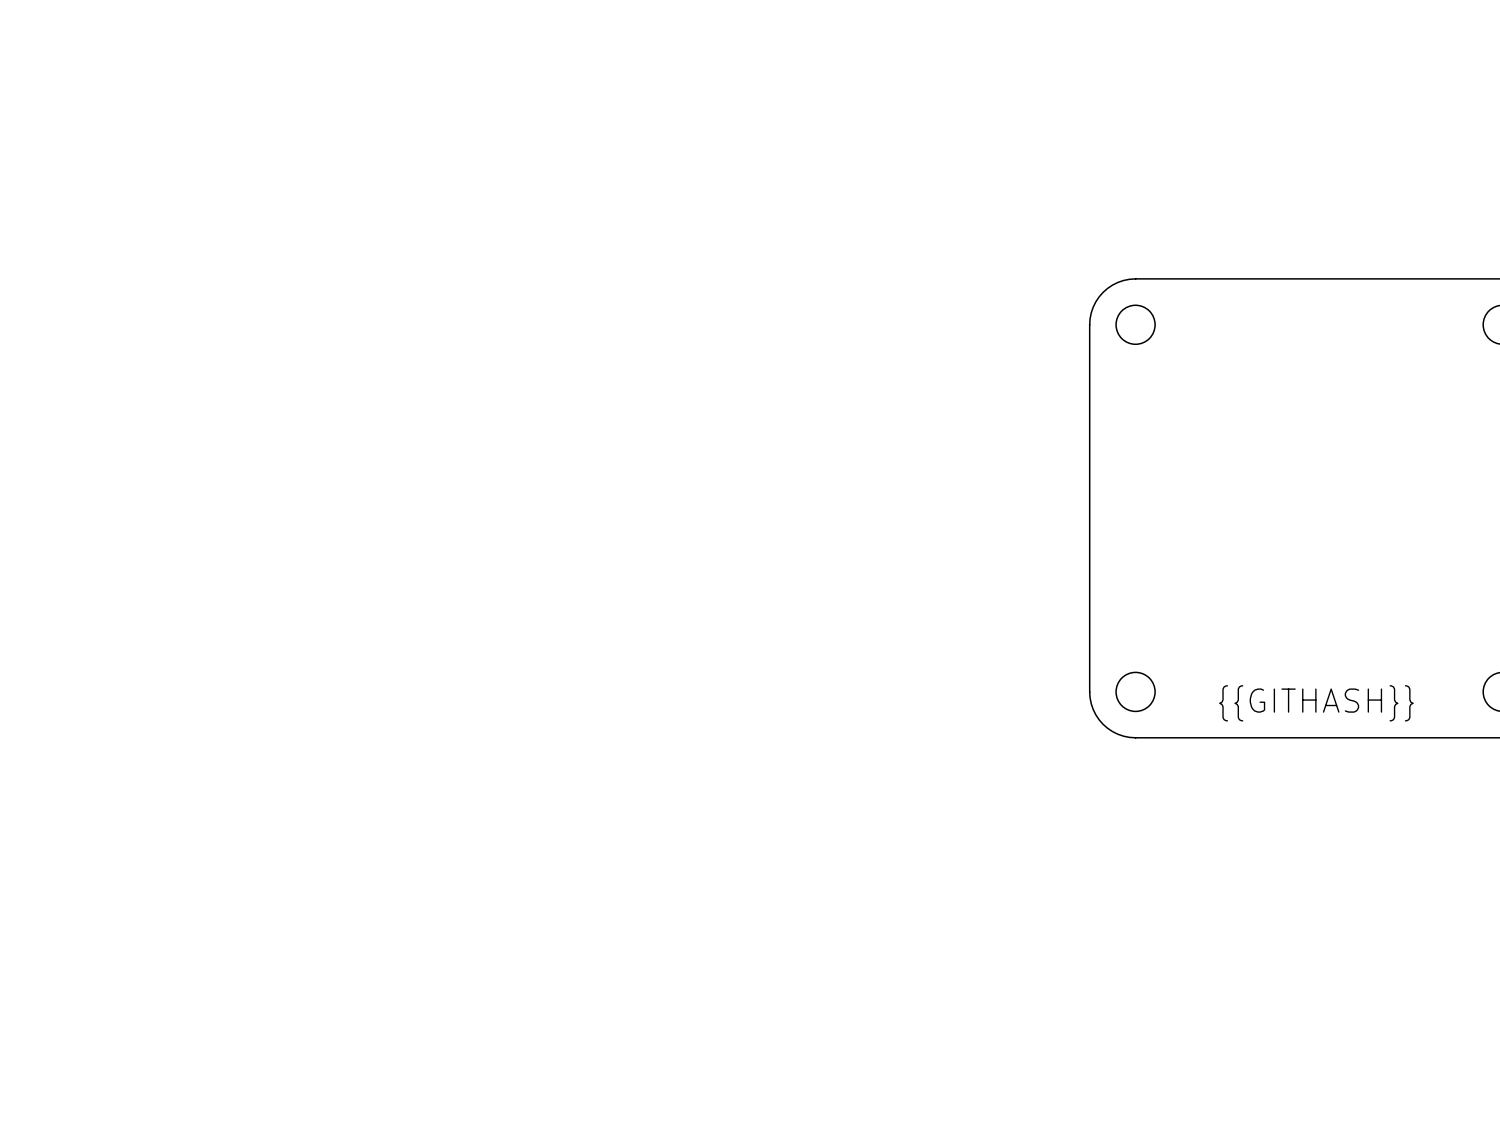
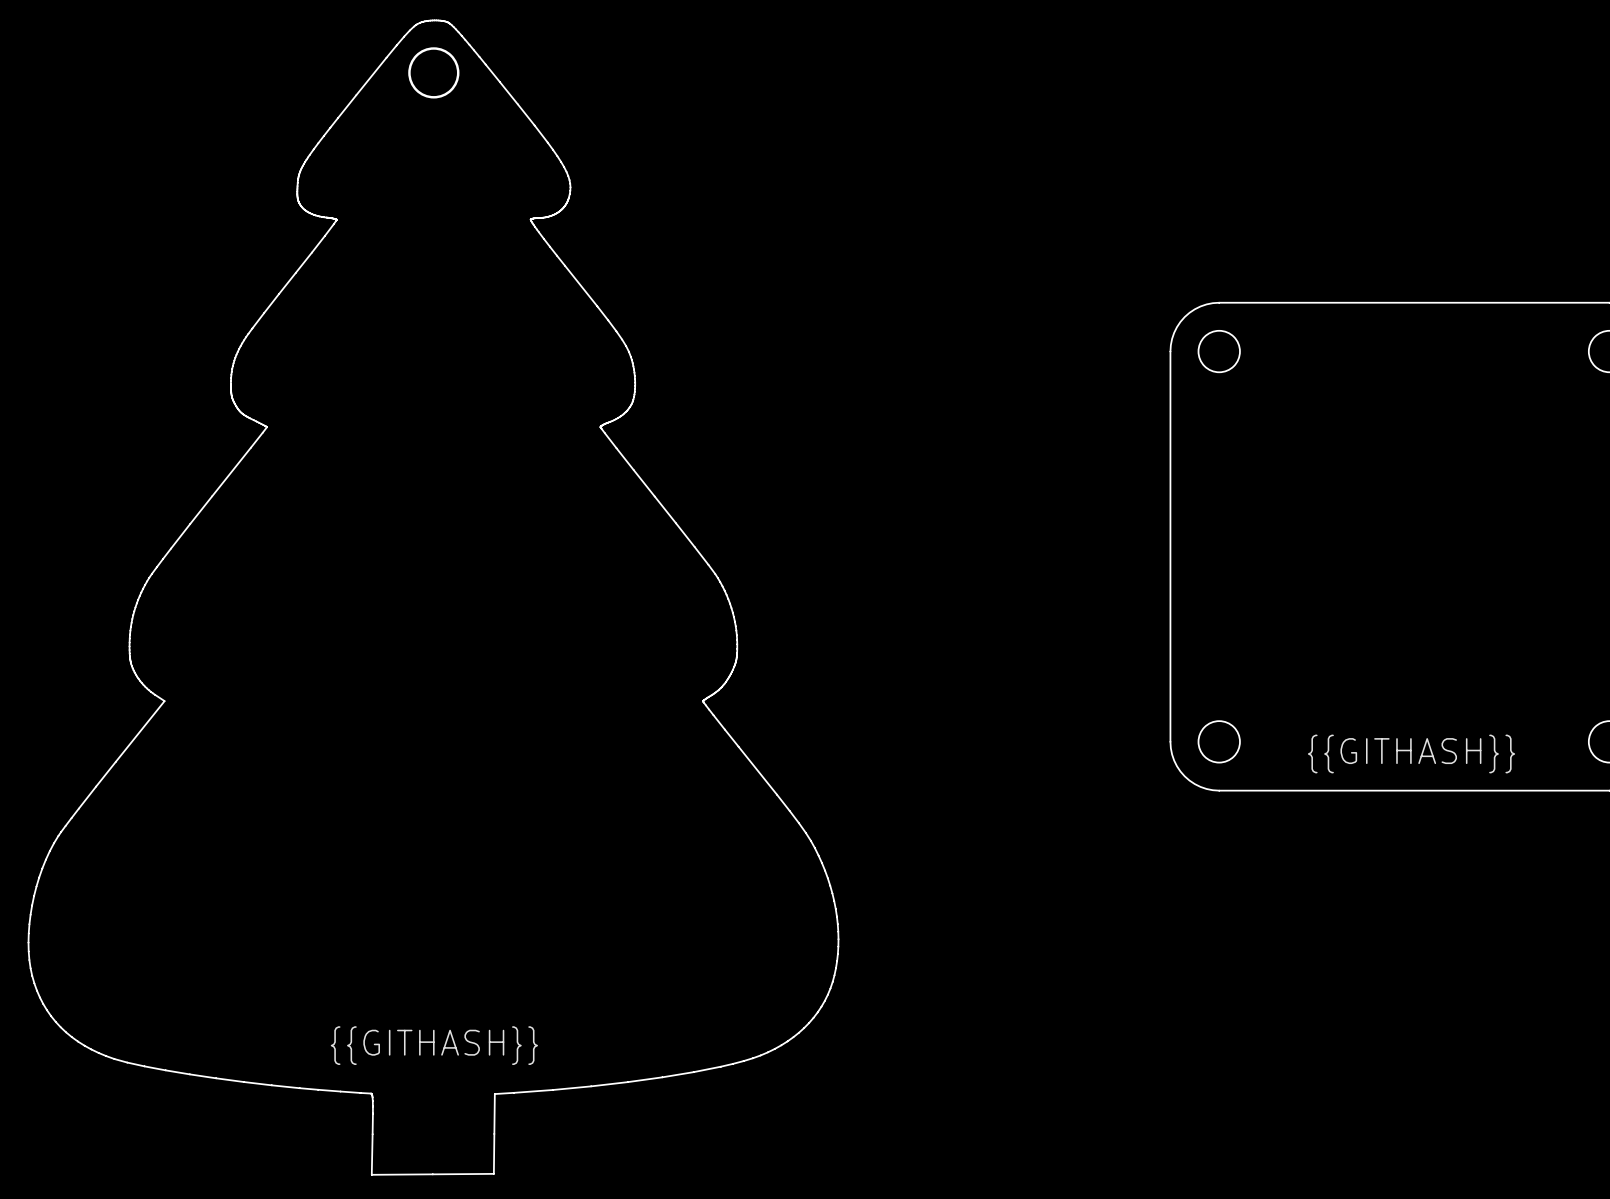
round board edge: none -> [408, 47, 460, 99]
board edge: none -> (336, 219) (311, 214) (300, 204) (297, 188) (301, 167) (323, 135) (404, 36) (417, 24) (434, 20) (448, 22) (461, 35) (534, 125) (566, 171) (570, 190) (564, 206) (552, 215) (530, 219)
board edge: none -> (336, 219) (248, 333) (234, 360) (230, 384) (233, 401) (243, 414) (266, 427)
board edge: none -> (530, 219) (616, 331) (630, 356) (635, 379) (632, 401) (622, 414) (600, 426)
board edge: none -> (267, 427) (163, 558) (143, 588) (131, 622) (129, 642) (130, 661) (141, 682) (164, 701) (58, 835) (45, 859) (36, 886) (30, 914) (28, 942) (30, 968) (34, 983) (51, 1016) (66, 1032) (84, 1045) (114, 1059) (165, 1070) (271, 1085) (371, 1093) (372, 1106) (371, 1174) (493, 1173) (494, 1094) (591, 1086) (662, 1077) (732, 1063) (774, 1048) (793, 1037) (809, 1023) (821, 1006) (830, 988) (835, 968) (838, 946) (834, 901) (821, 863) (805, 832) (703, 701)
board edge: none -> (600, 427) (708, 564) (720, 582) (728, 599) (736, 630) (735, 661) (723, 685) (703, 701)
text: none -> {{GITHASH}} (434, 1045)

